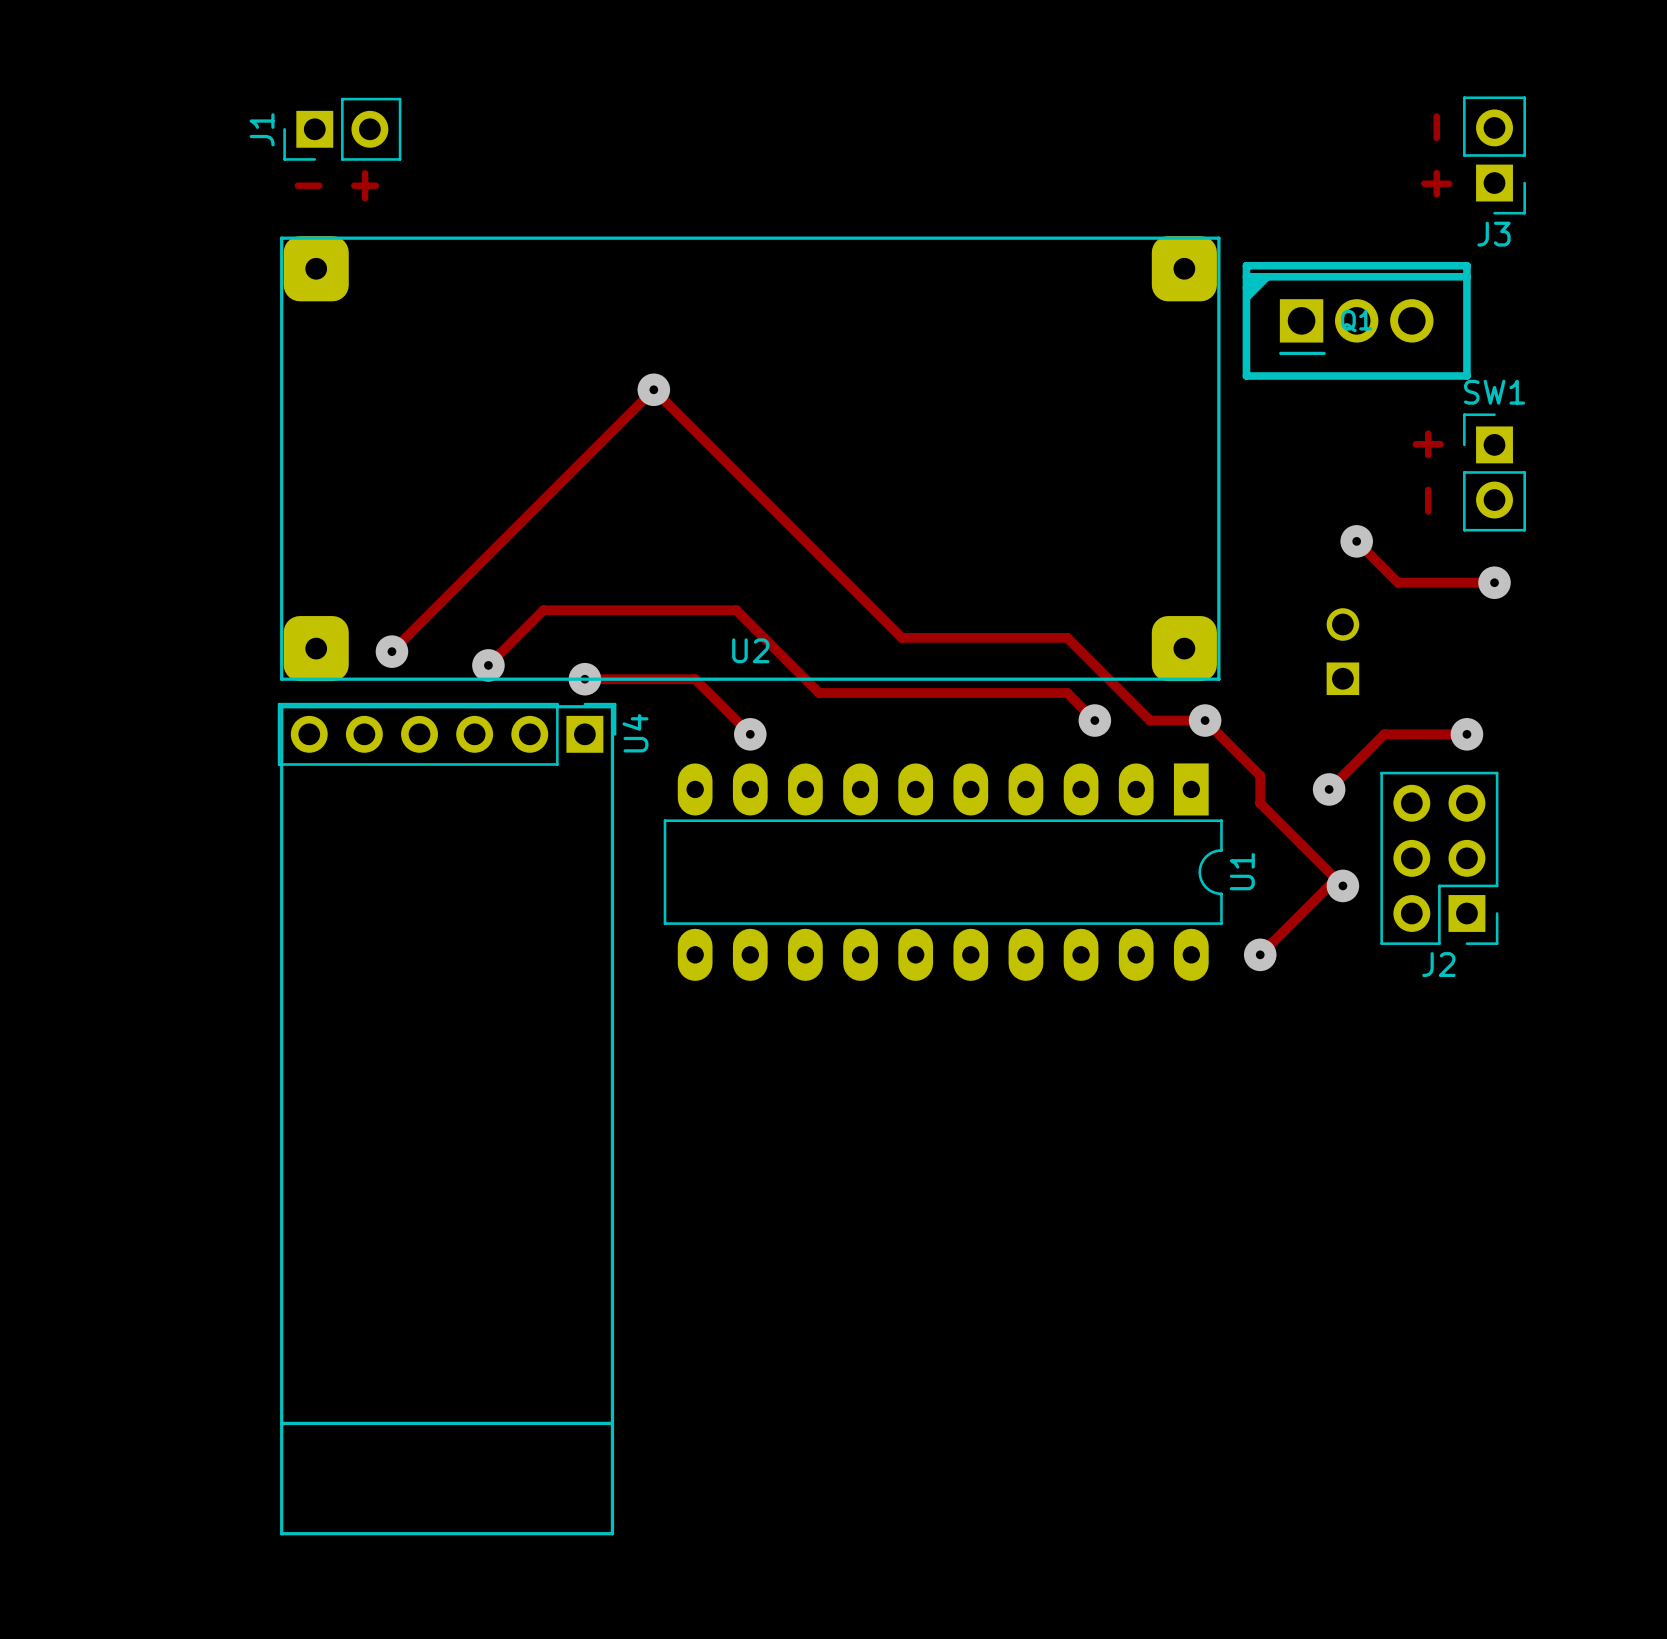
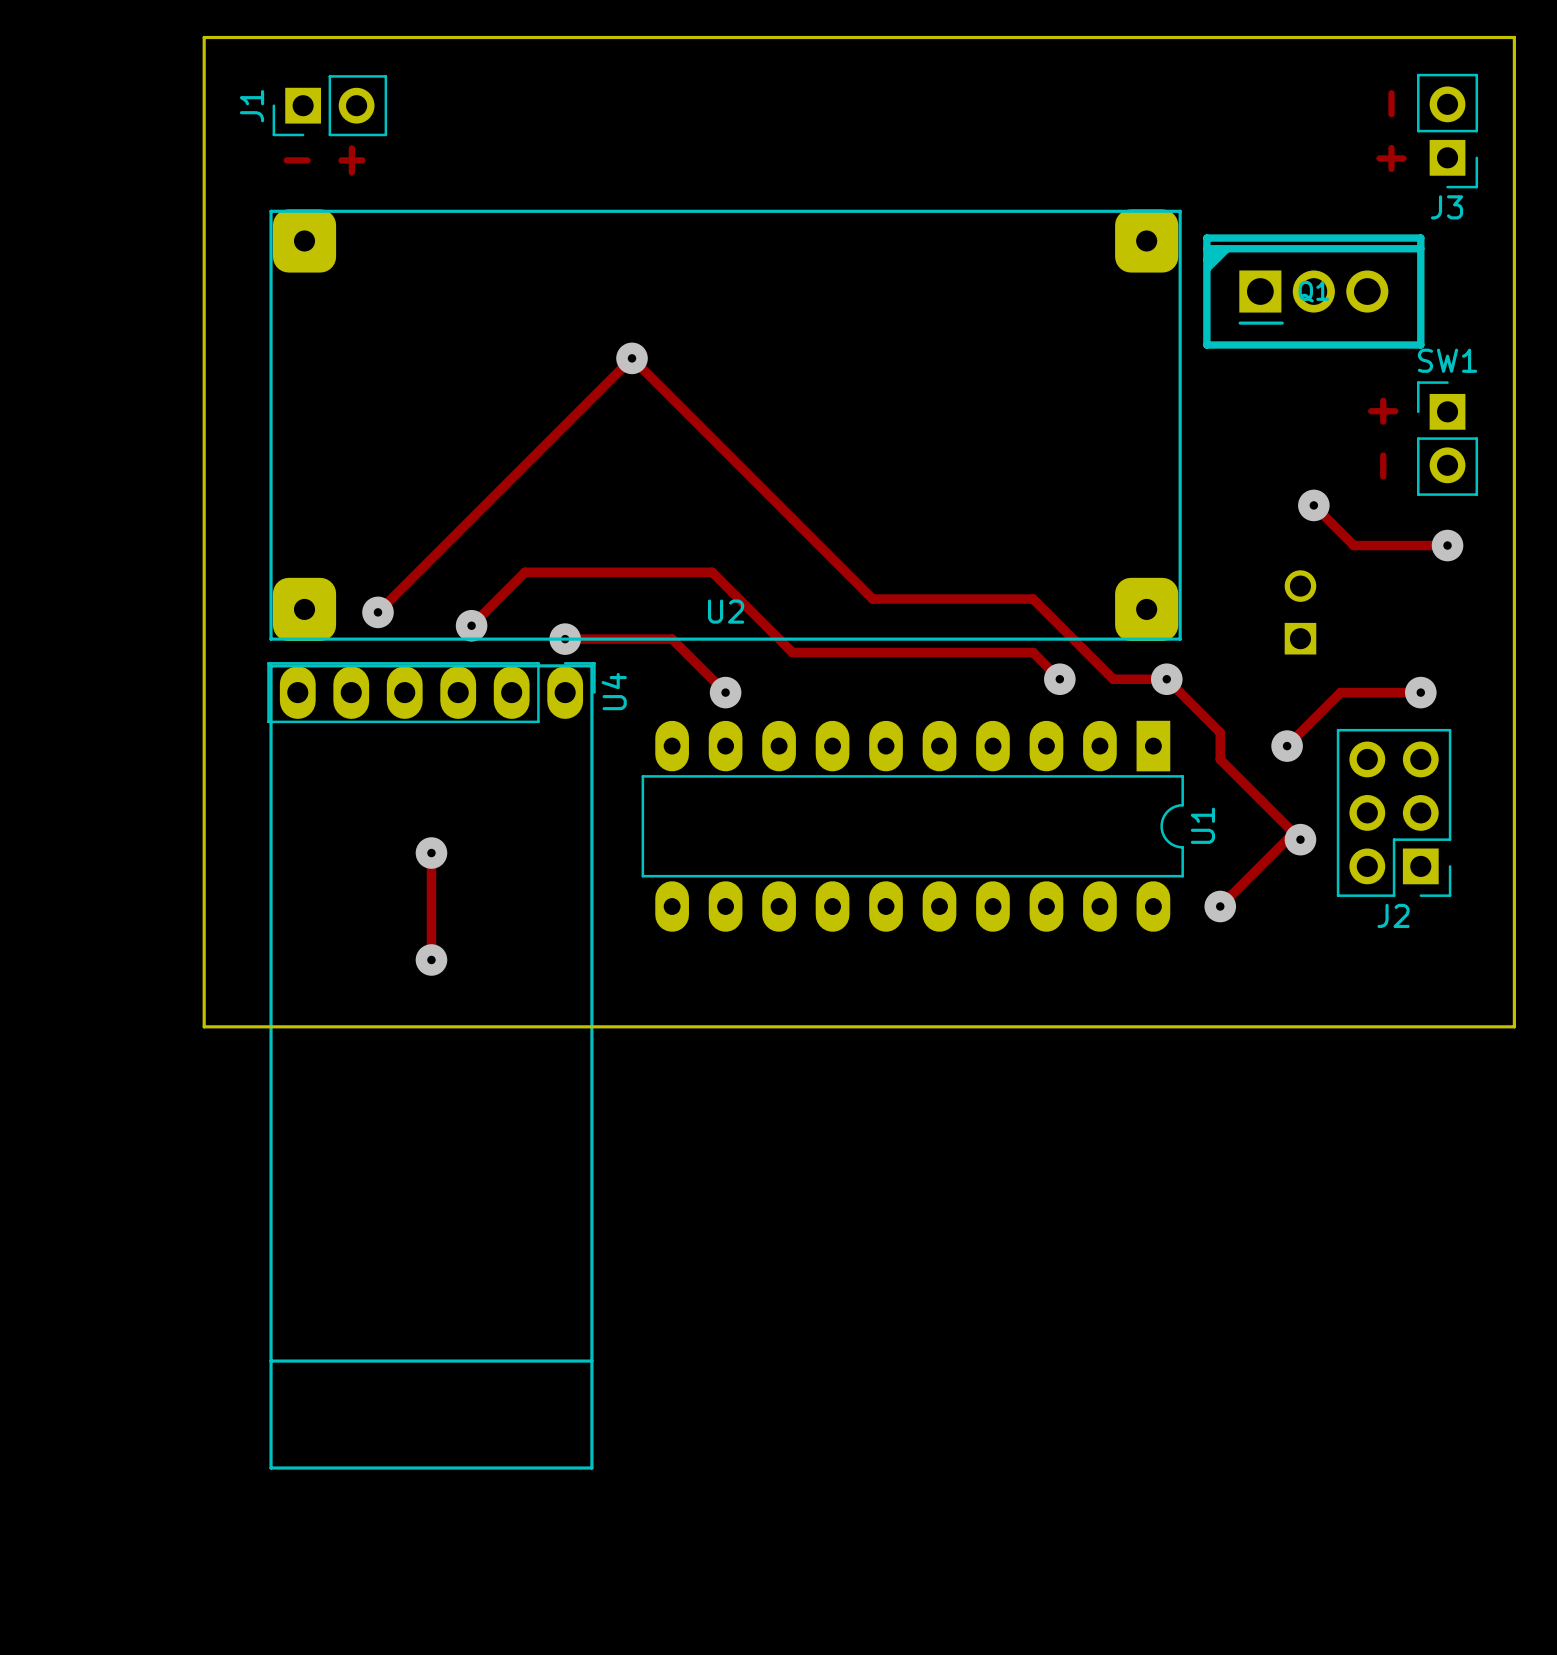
board edge: none -> (204, 37) (204, 1026) (1514, 1026) (1514, 37) (204, 37)
U4 footprint: [277, 702, 617, 1536] -> [267, 662, 596, 1470]
track: none -> (431, 853) (431, 959)
via: none -> (431, 853)
via: none -> (431, 959)

